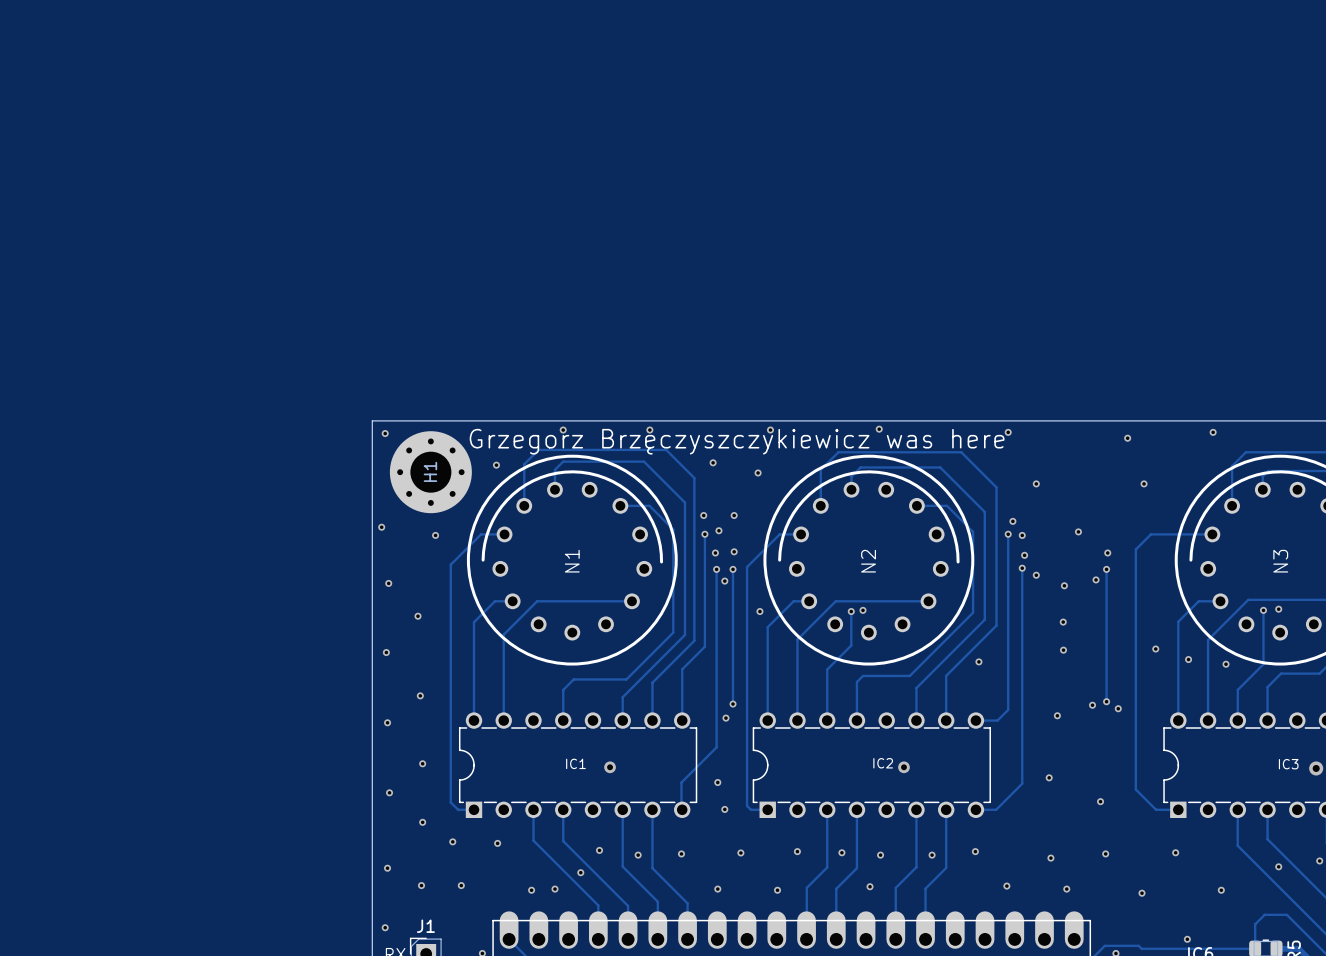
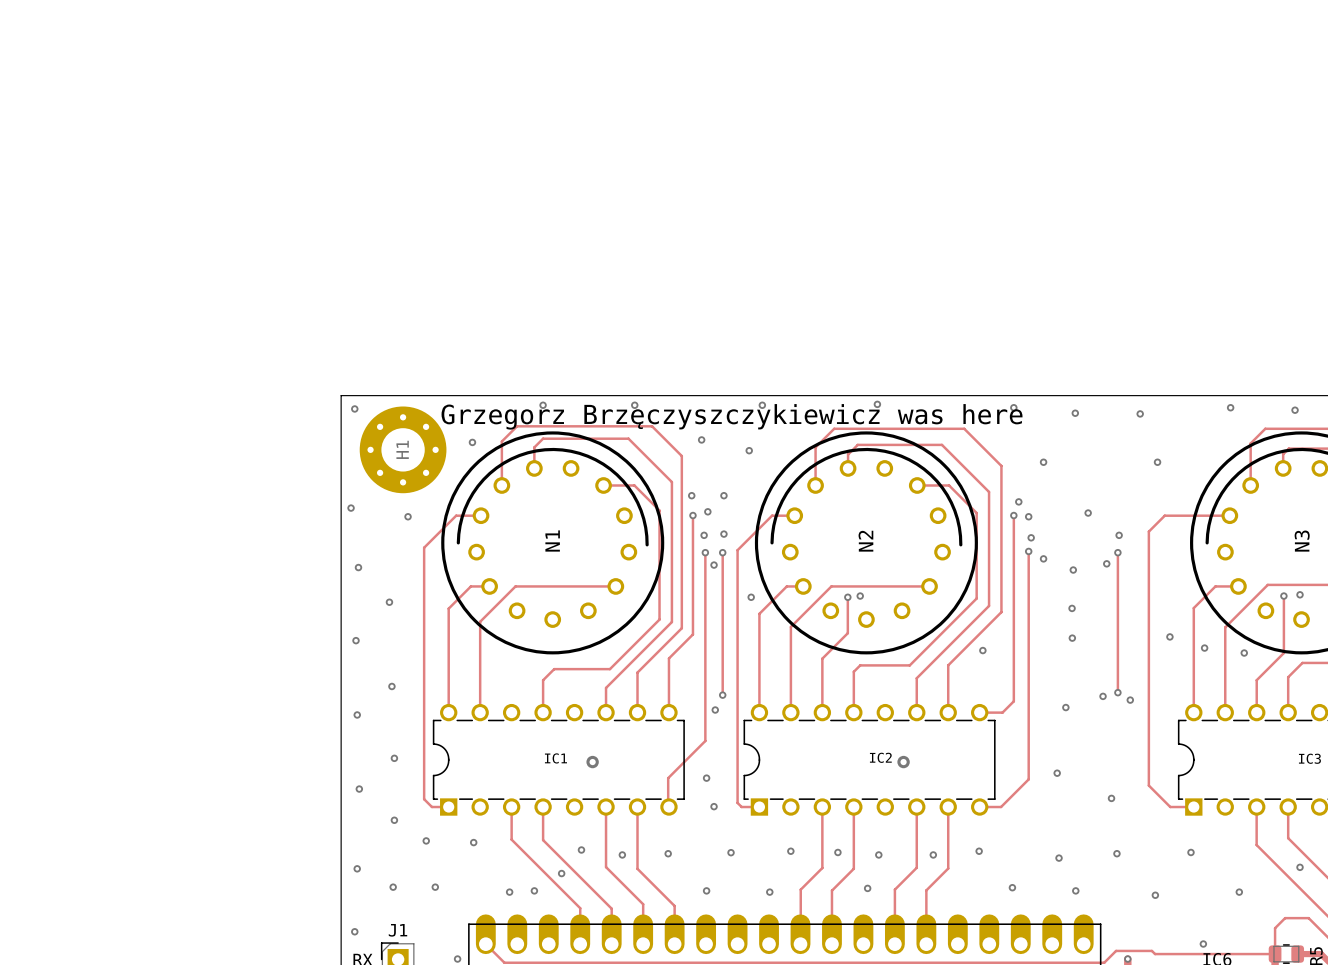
via: none -> (1295, 410)
via: none -> (1075, 413)

